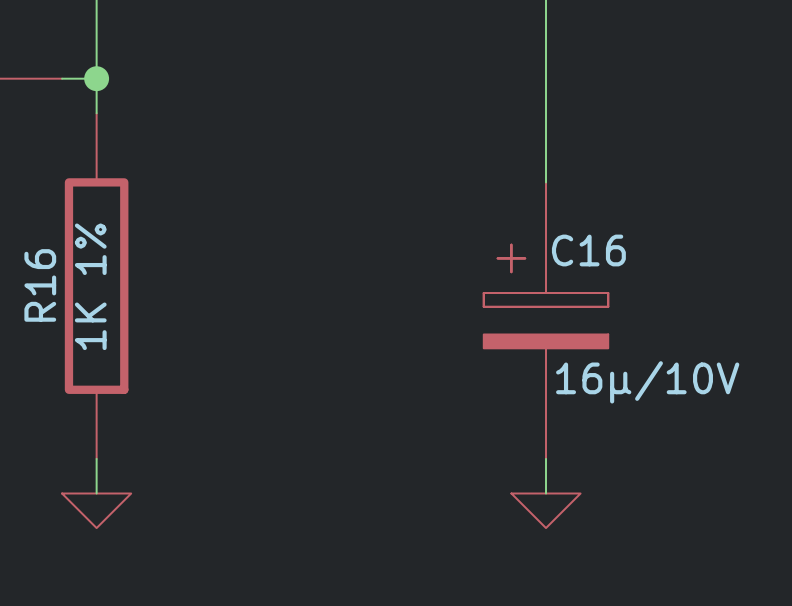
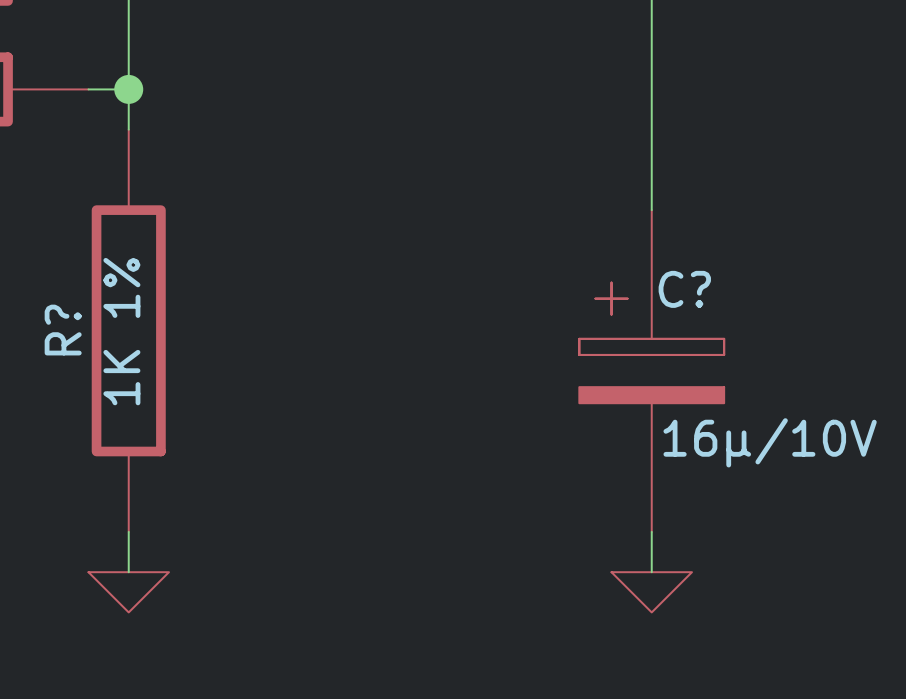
C16 name: C16 (588, 250) -> C? (684, 289)
R16 name: R16 (40, 285) -> R? (63, 330)

